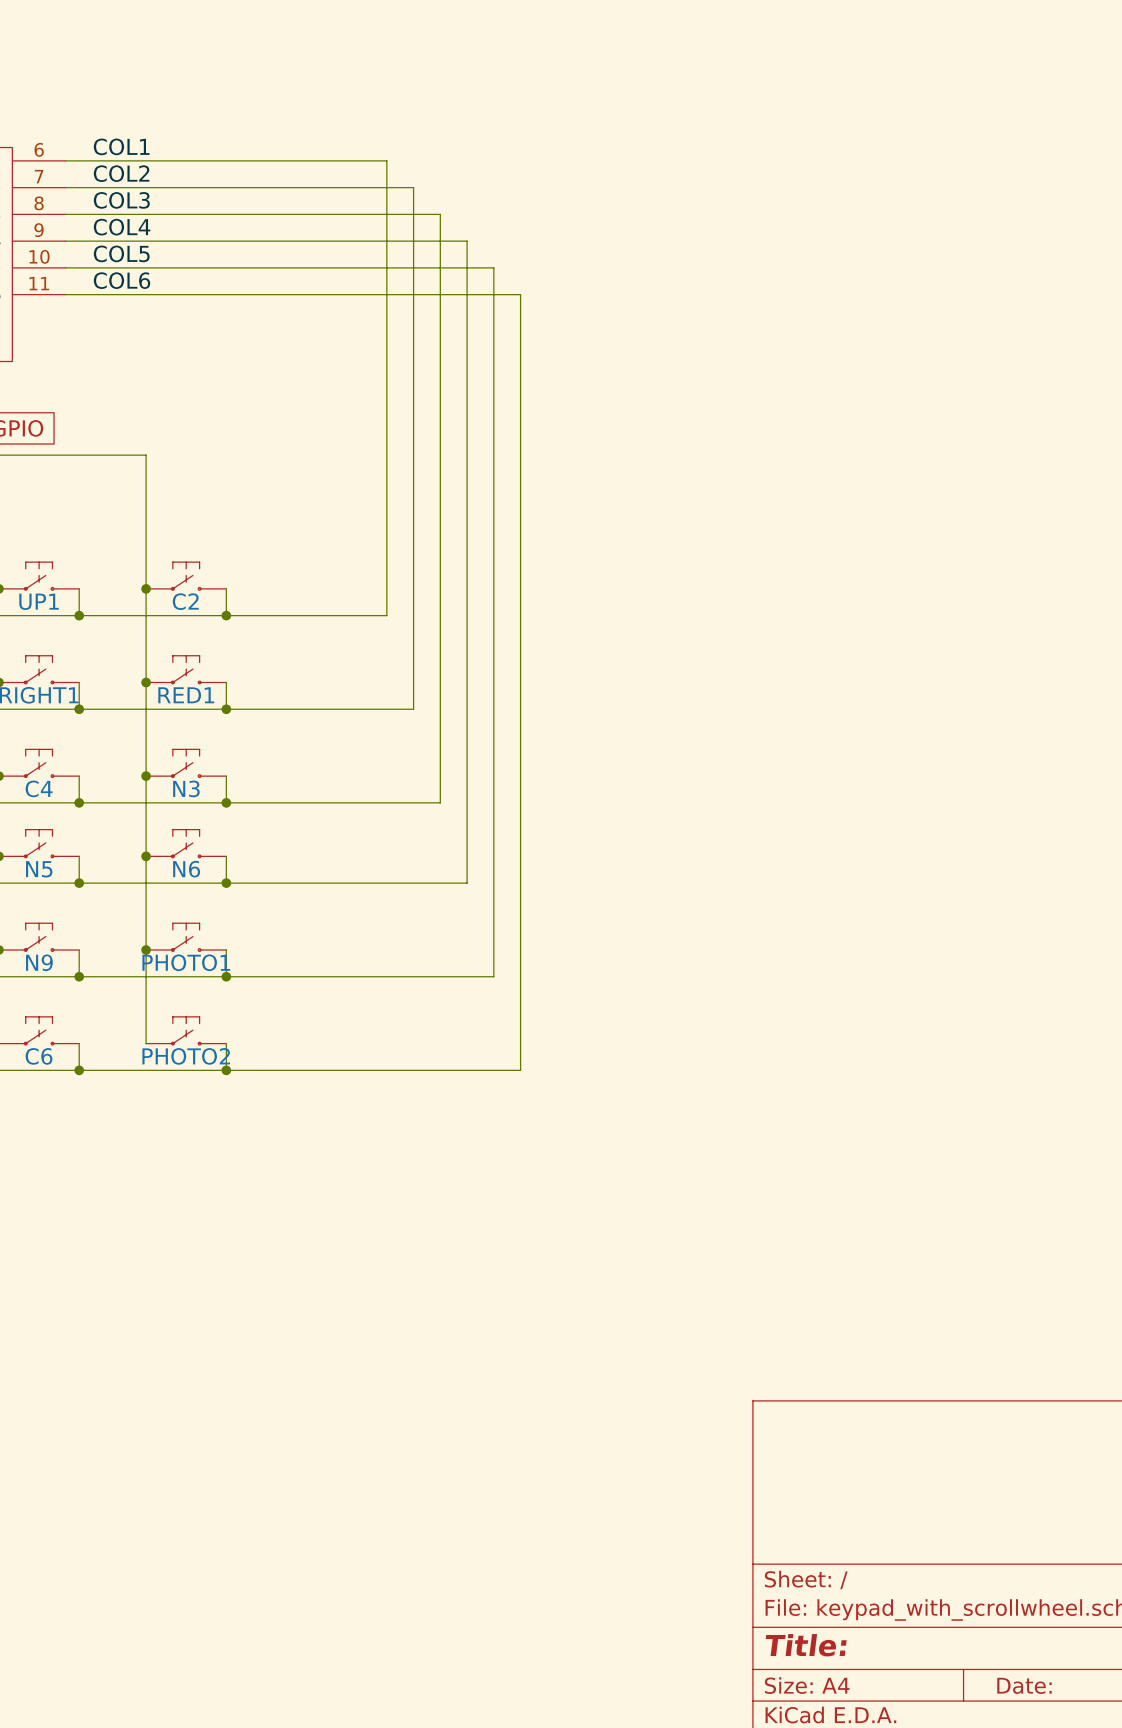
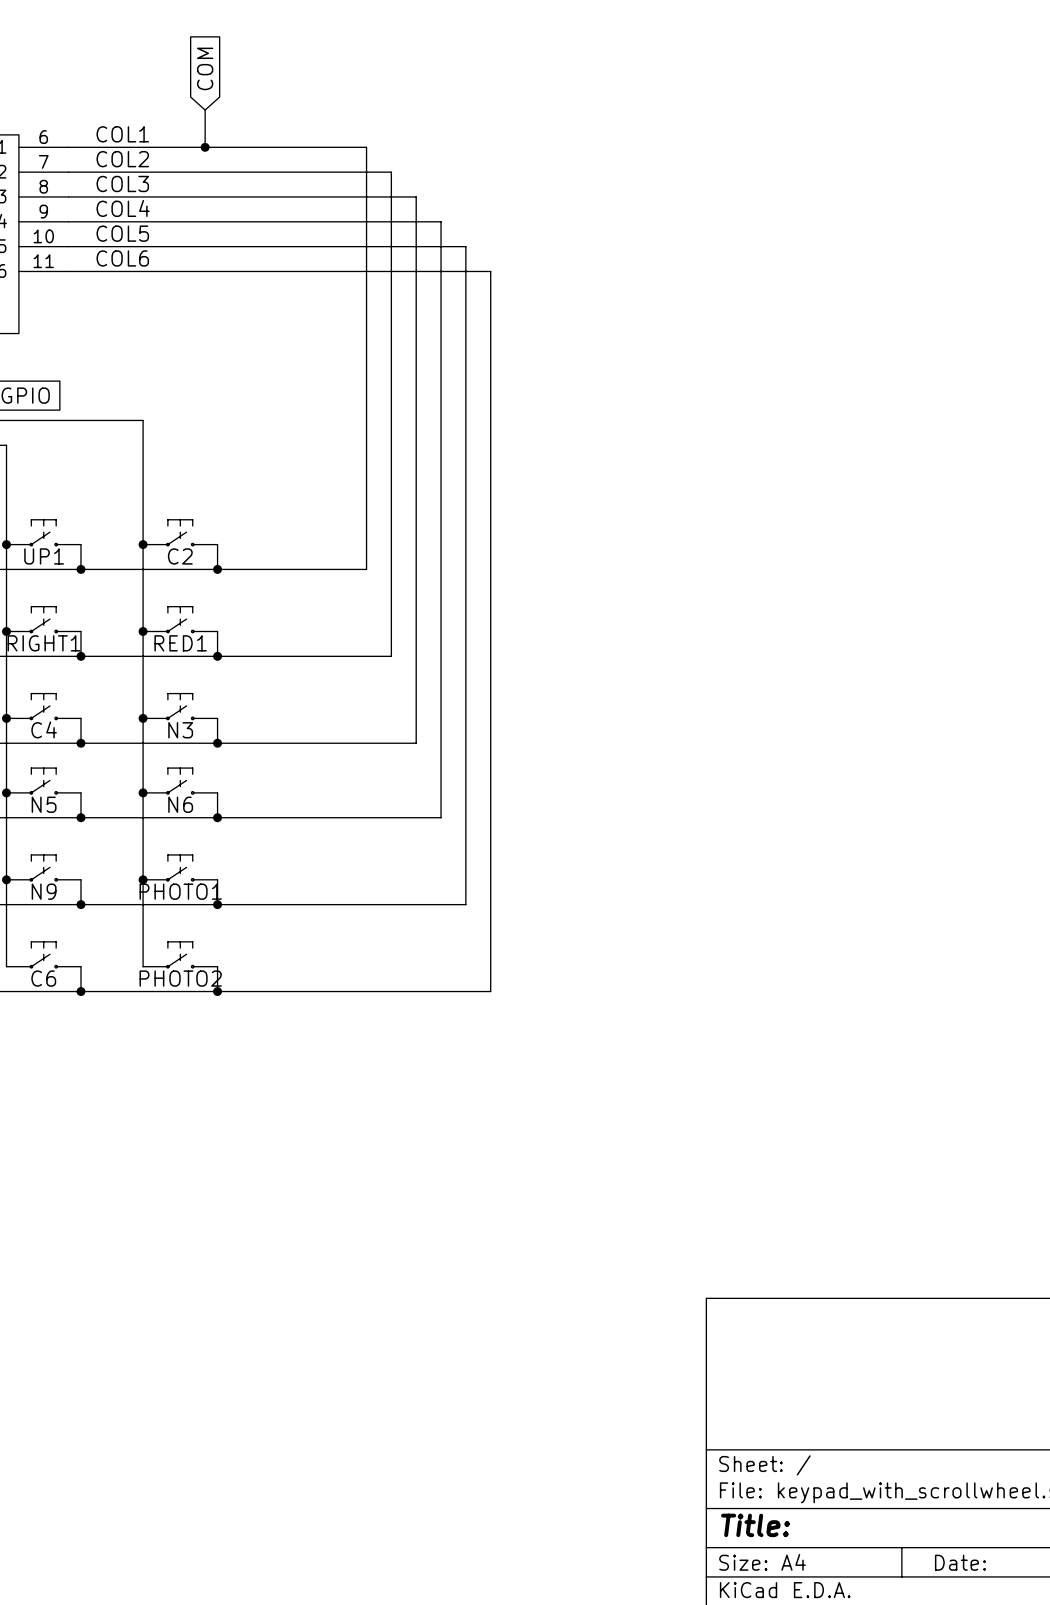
global label: none -> COM (205, 68)
wire: none -> (205, 110) (205, 147)
junction: none -> (205, 147)

